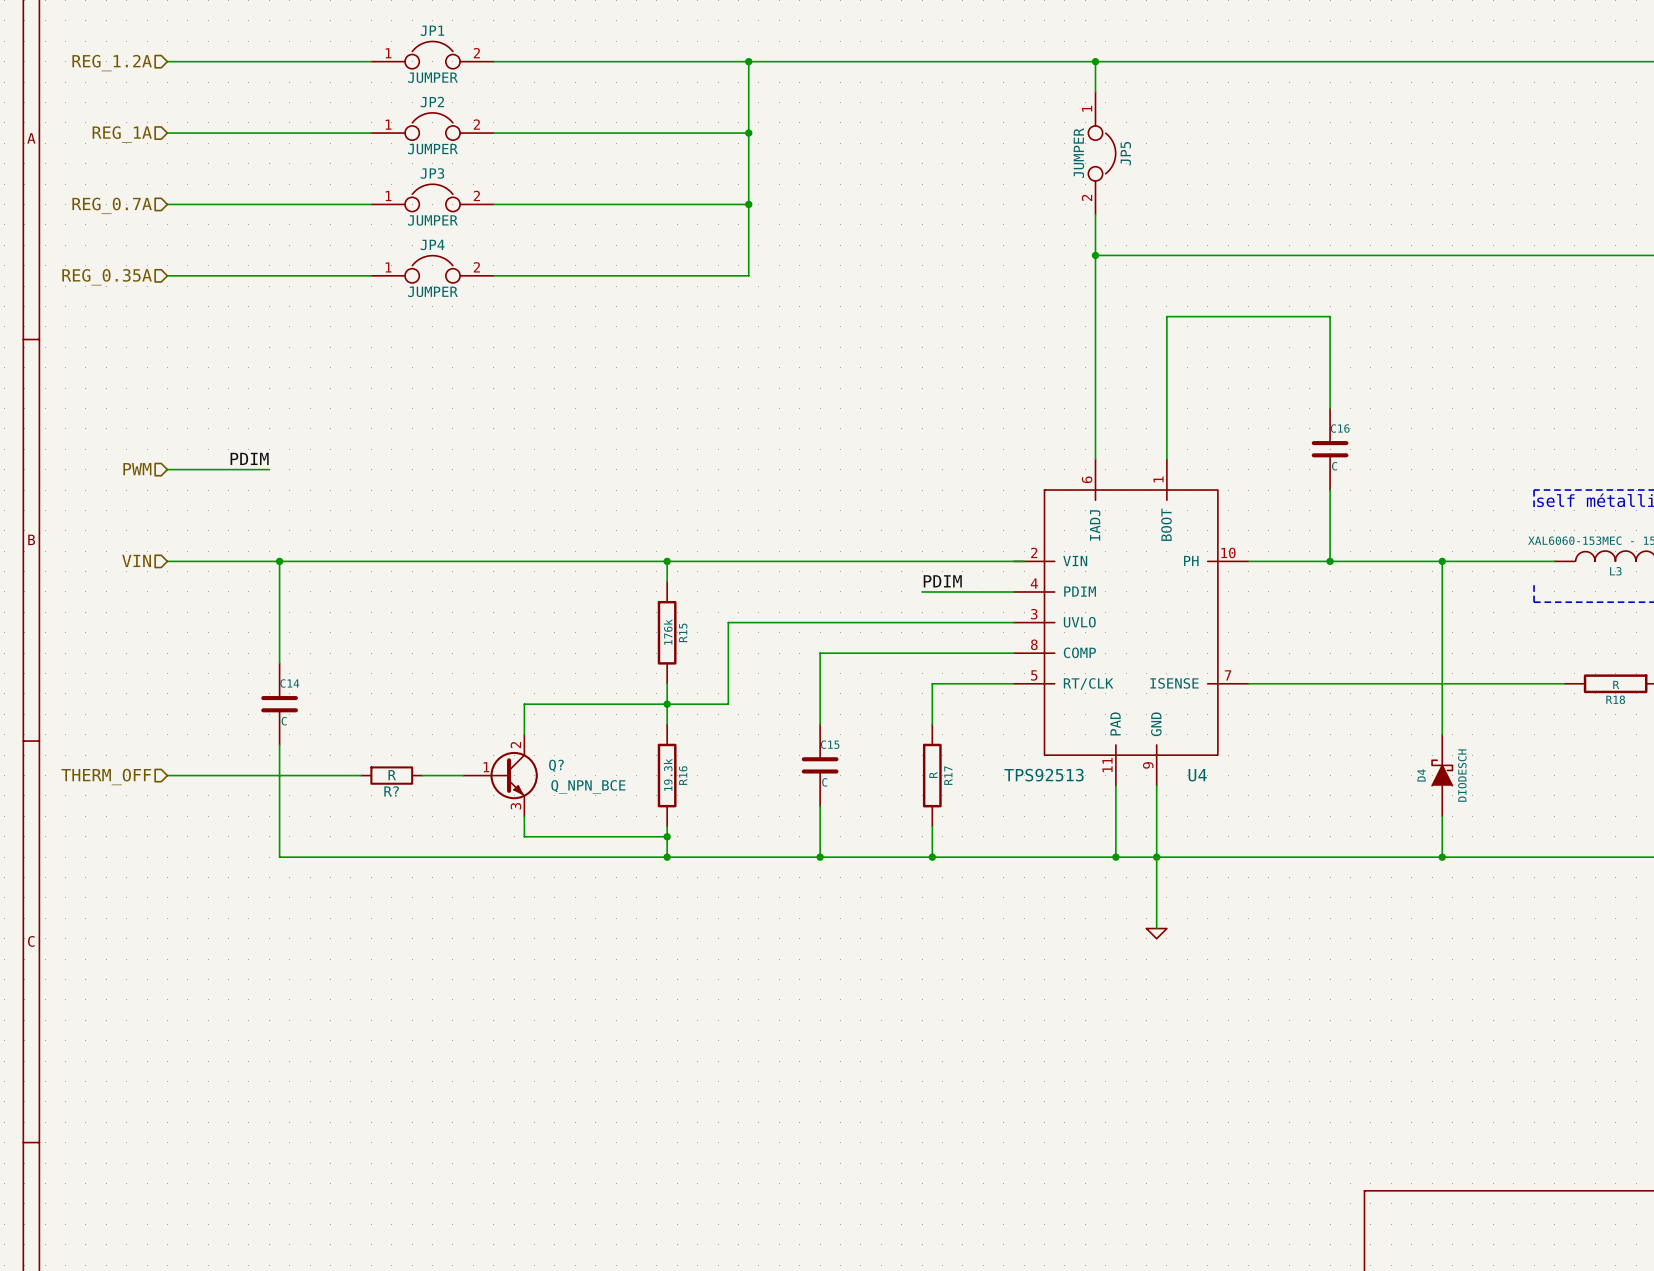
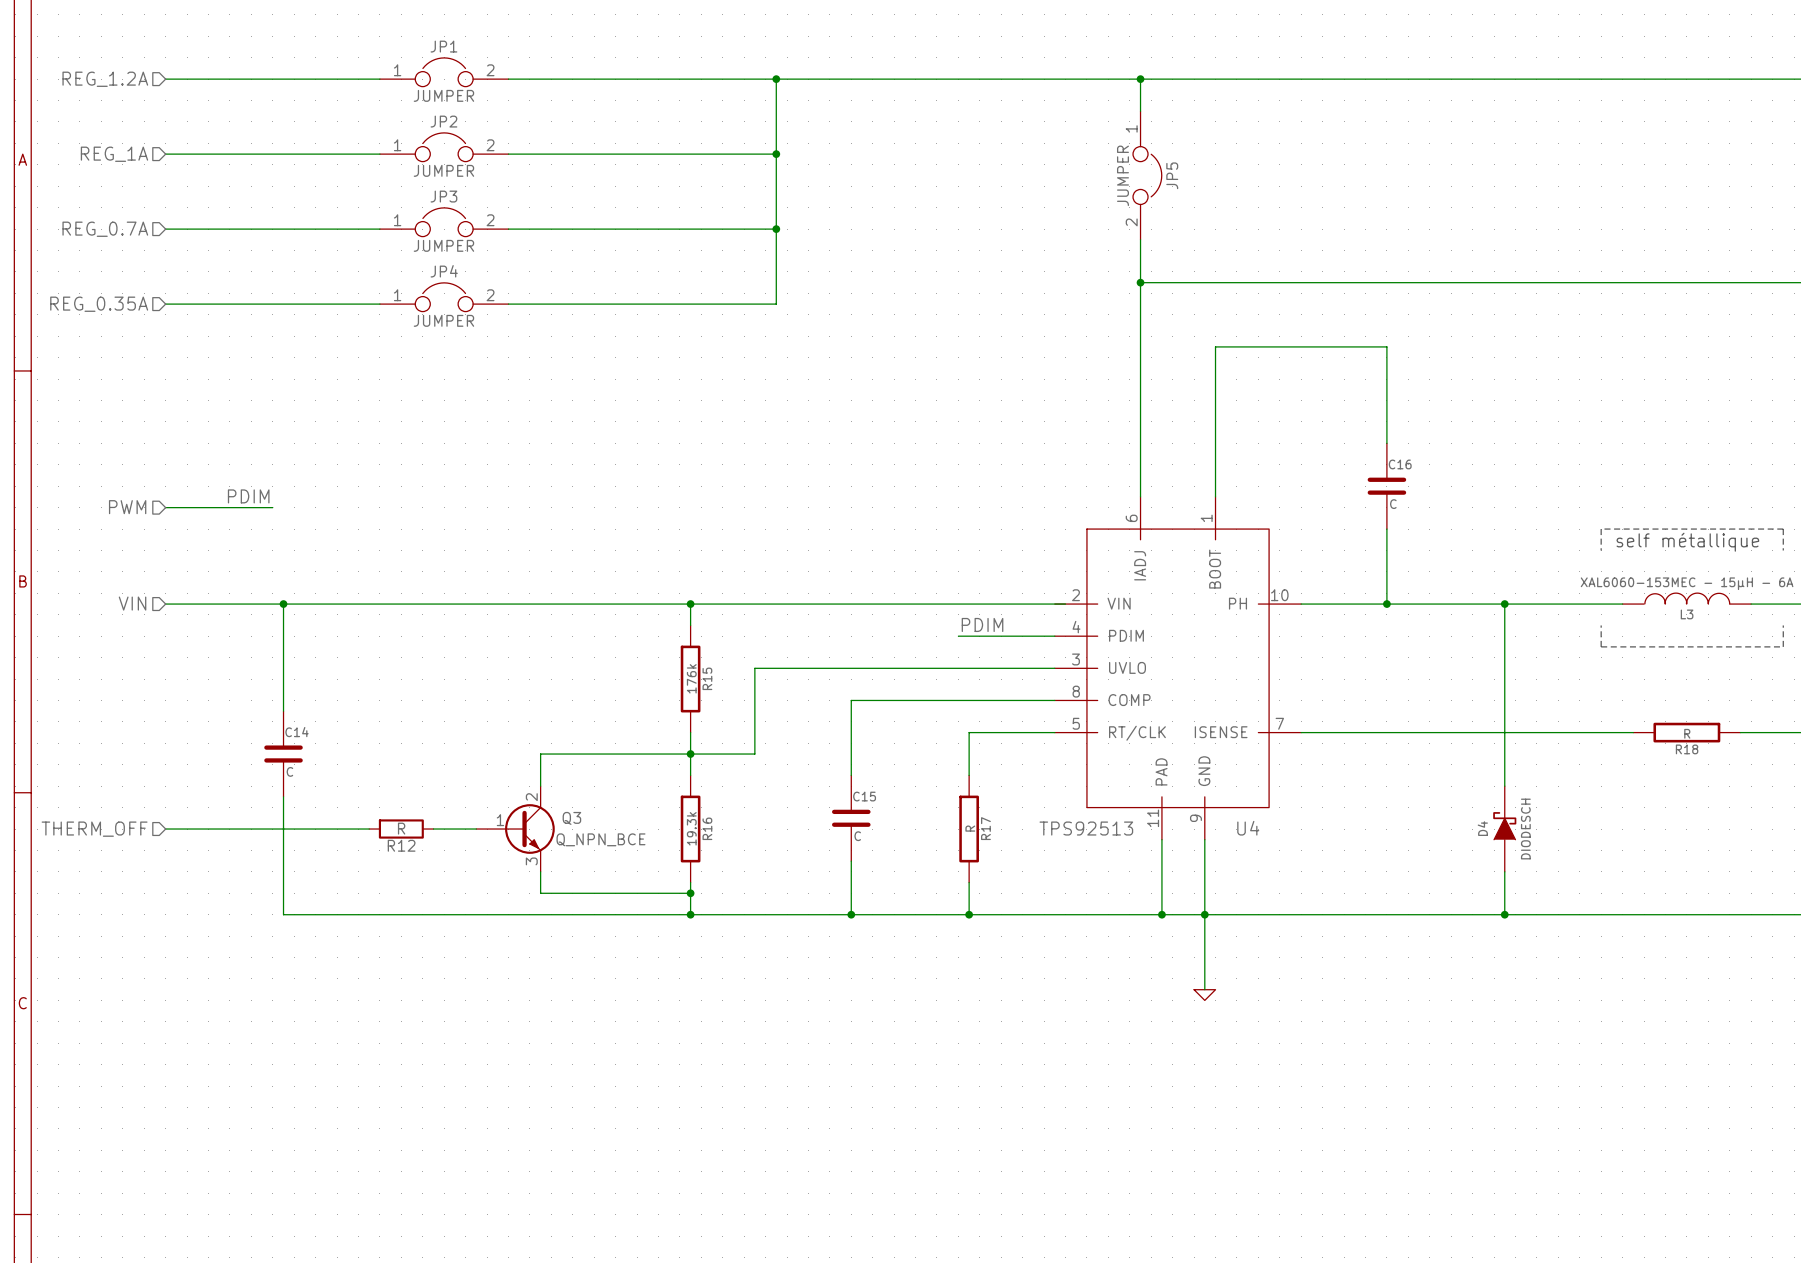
Q? name: Q? (556, 765) -> Q3 (571, 818)
R? name: R? (391, 791) -> R12 (401, 845)

